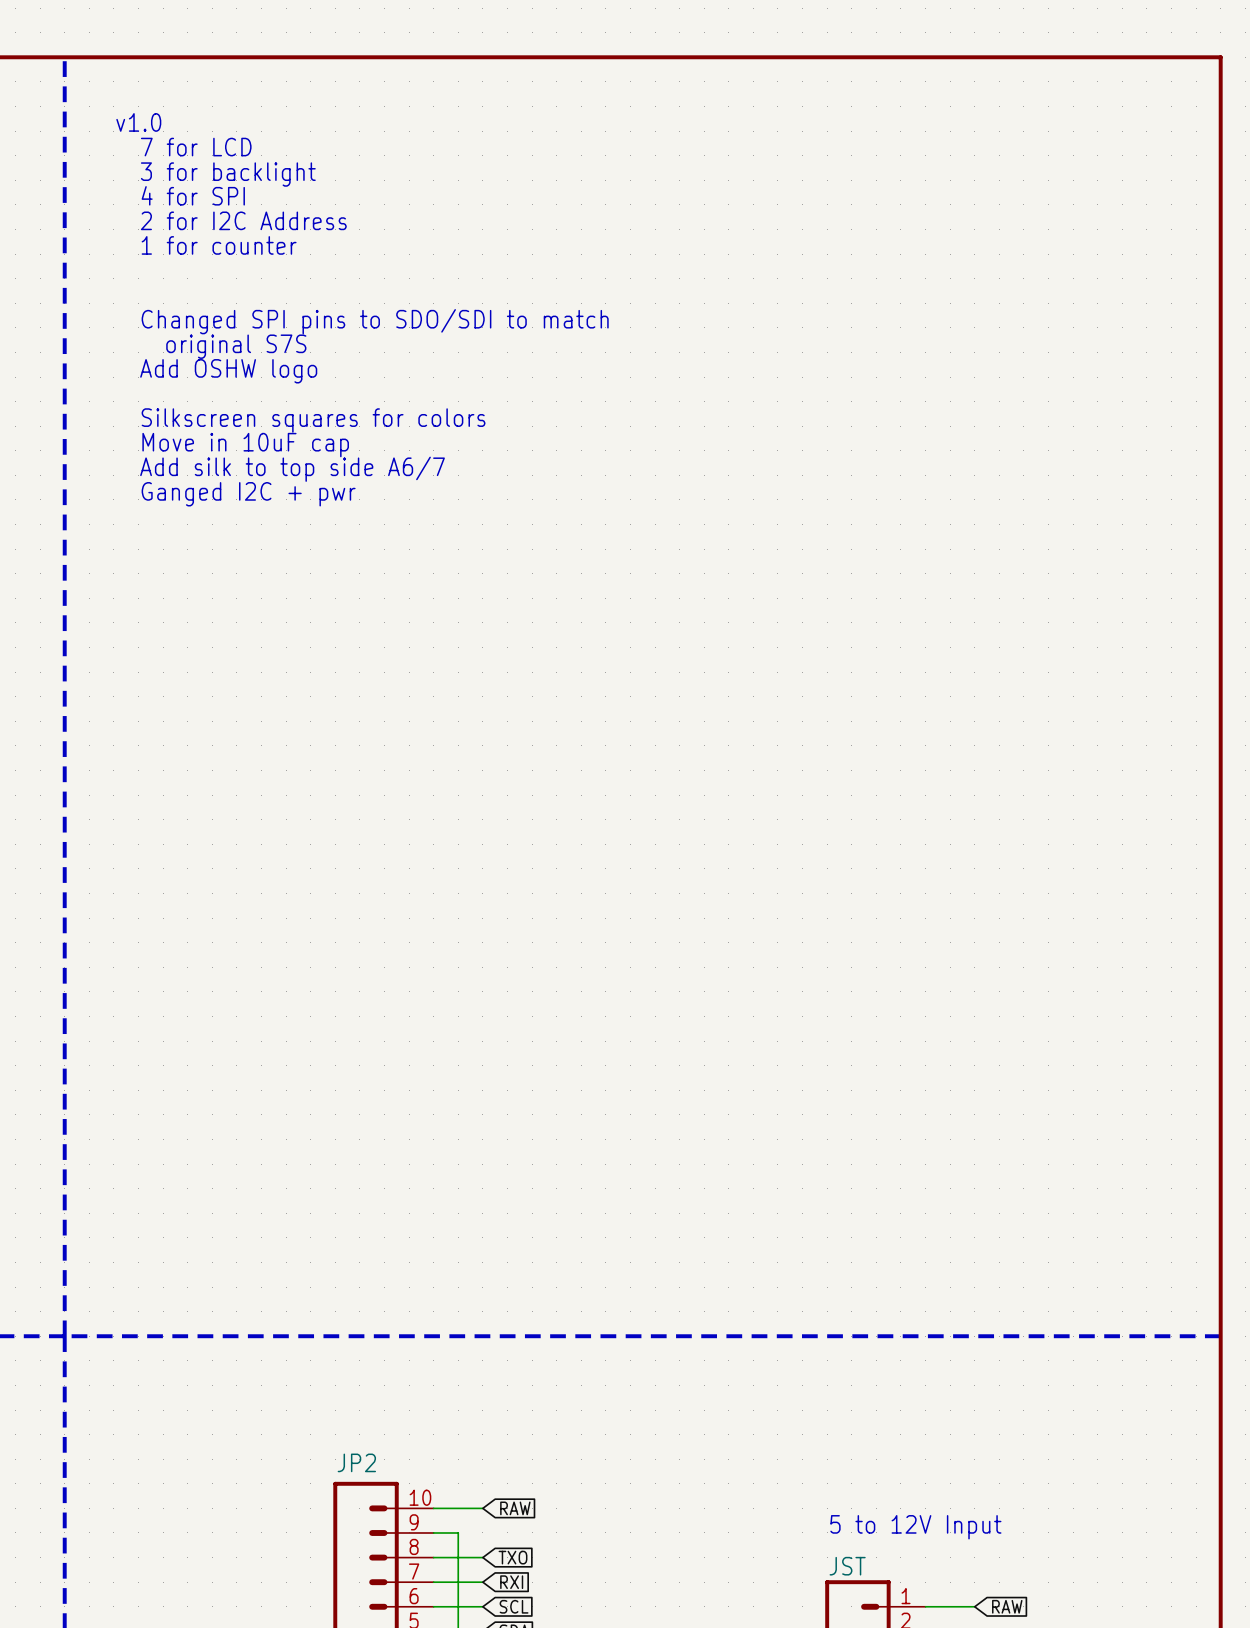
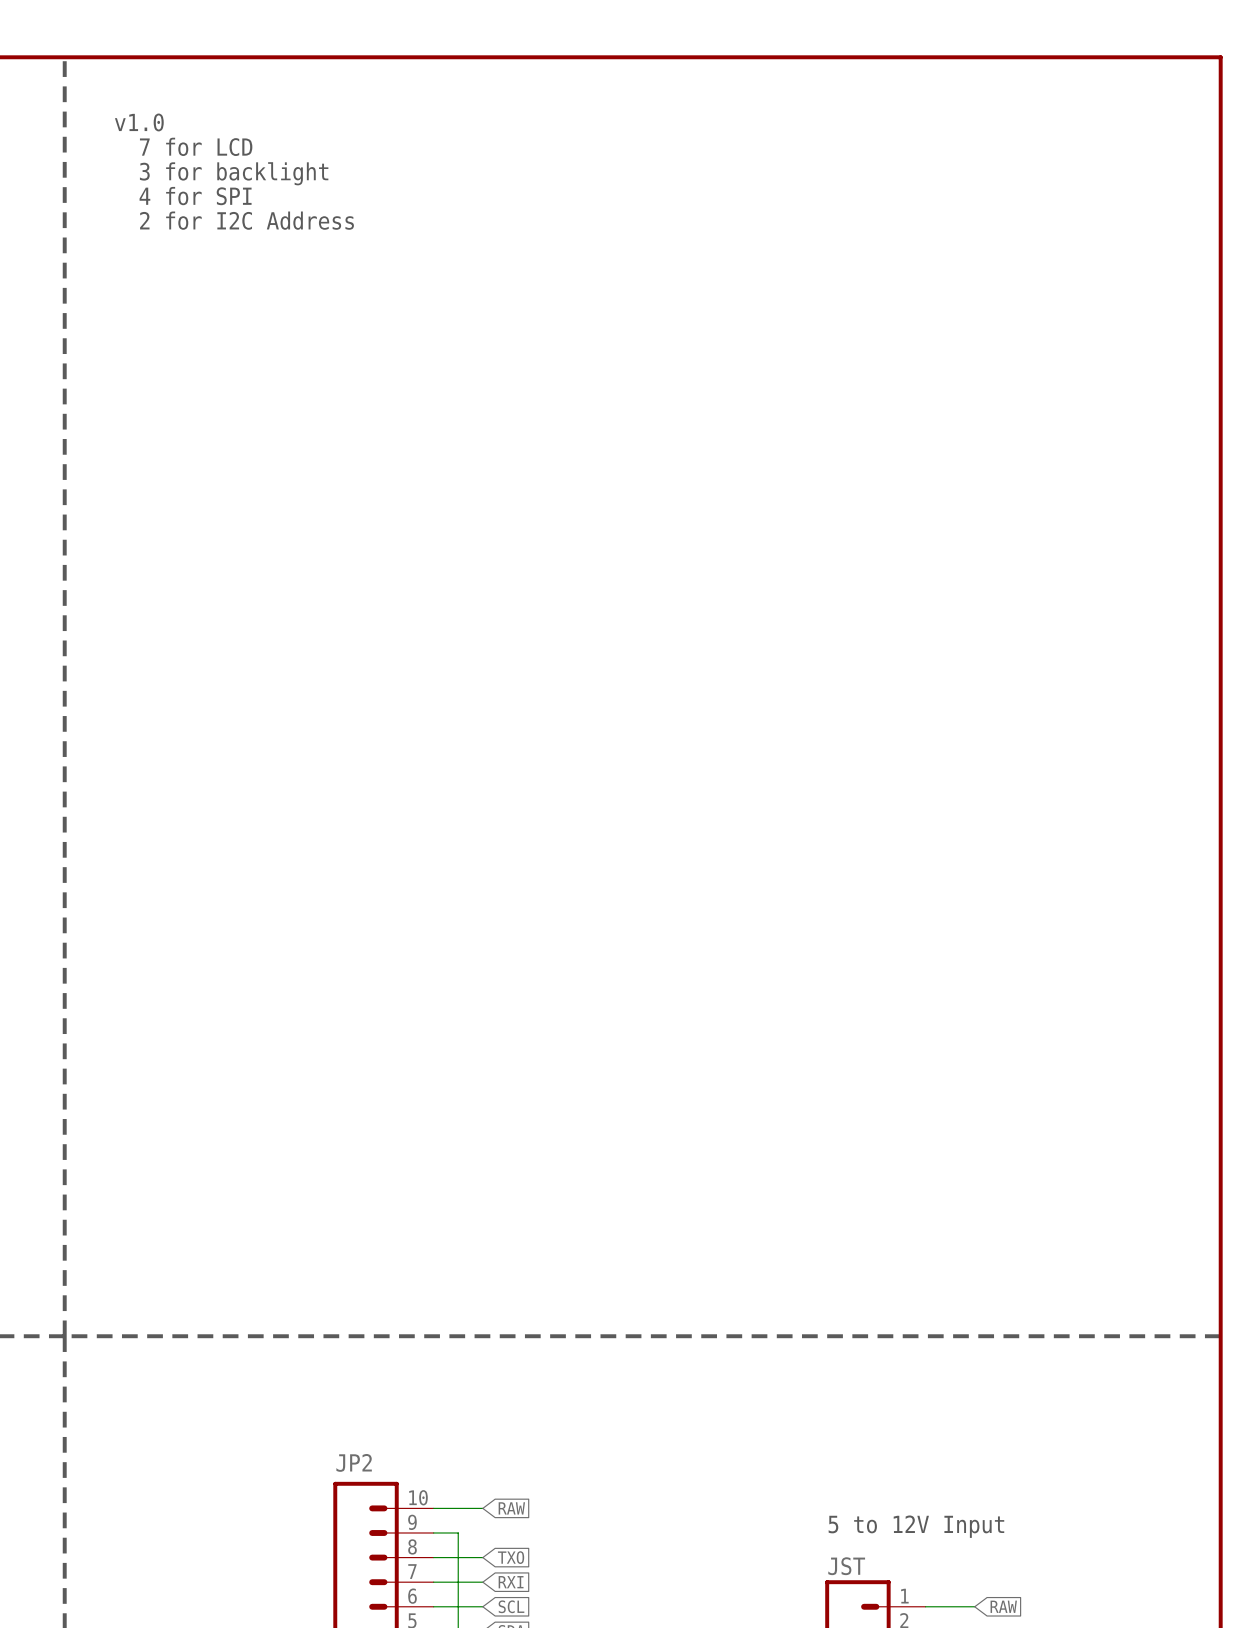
text: 1 for counter (219, 245) -> none
text: Changed SPI pins to SDO/SDI to match (375, 321) -> none
text: original S7S (236, 346) -> none
text: Add OSHW logo (228, 371) -> none
text: Silkscreen squares for colors (313, 420) -> none
text: Move in 10uF cap (245, 445) -> none
text: Add silk to top side A6/7 (292, 469) -> none
text: Ganged I2C + pwr (248, 494) -> none

